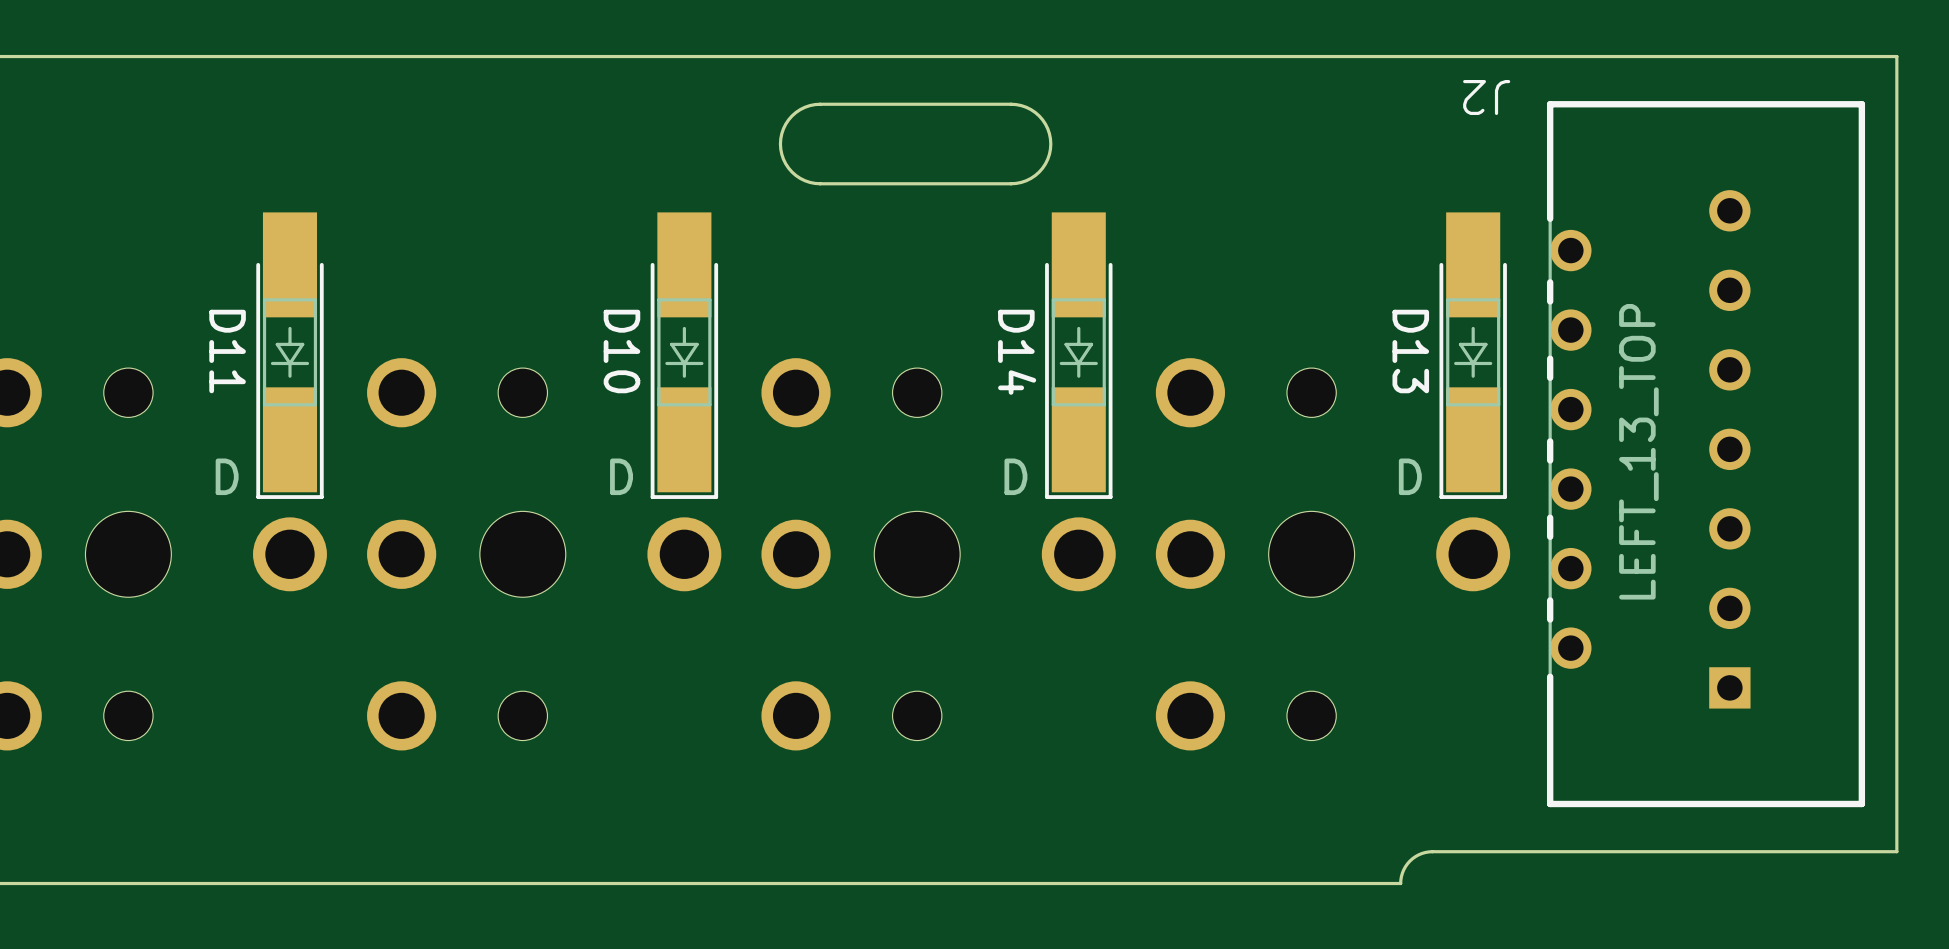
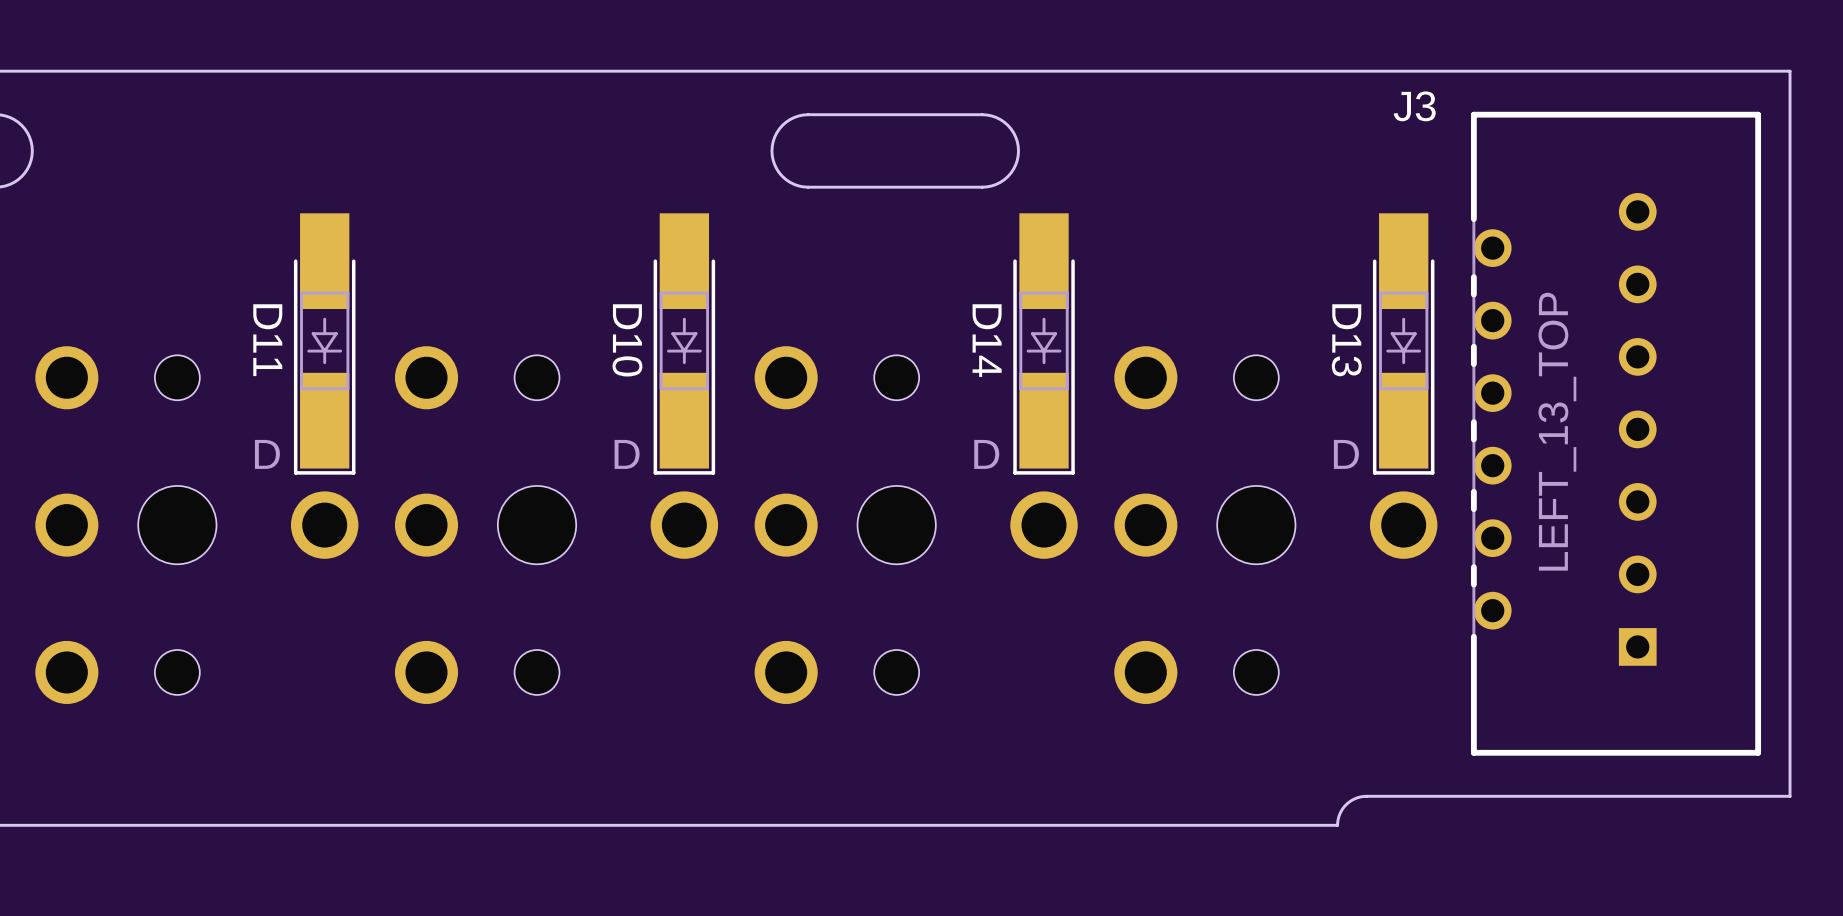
J2 name: J2 (1486, 97) -> J3 (1414, 106)

